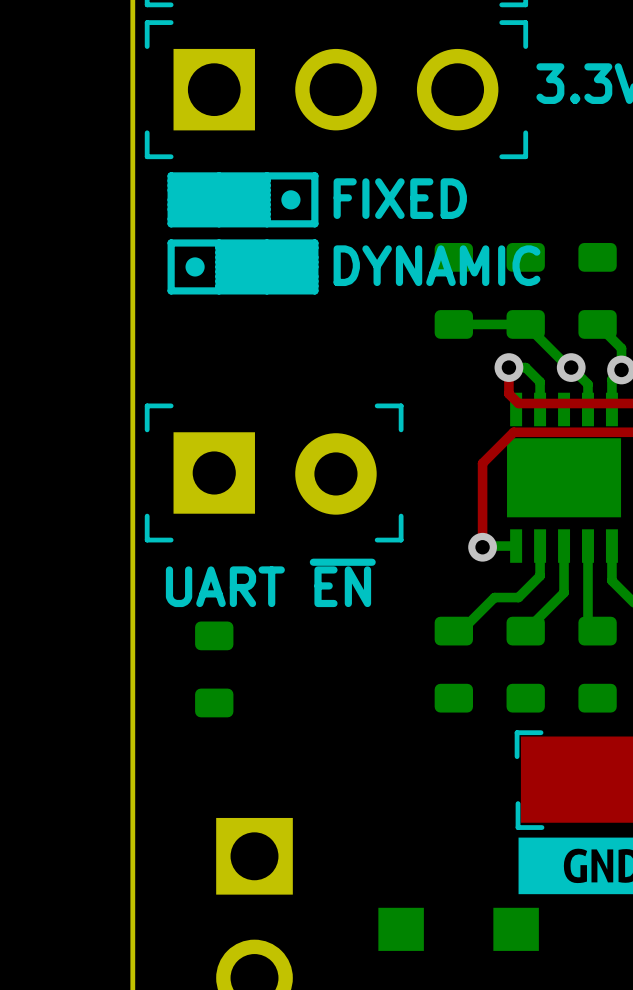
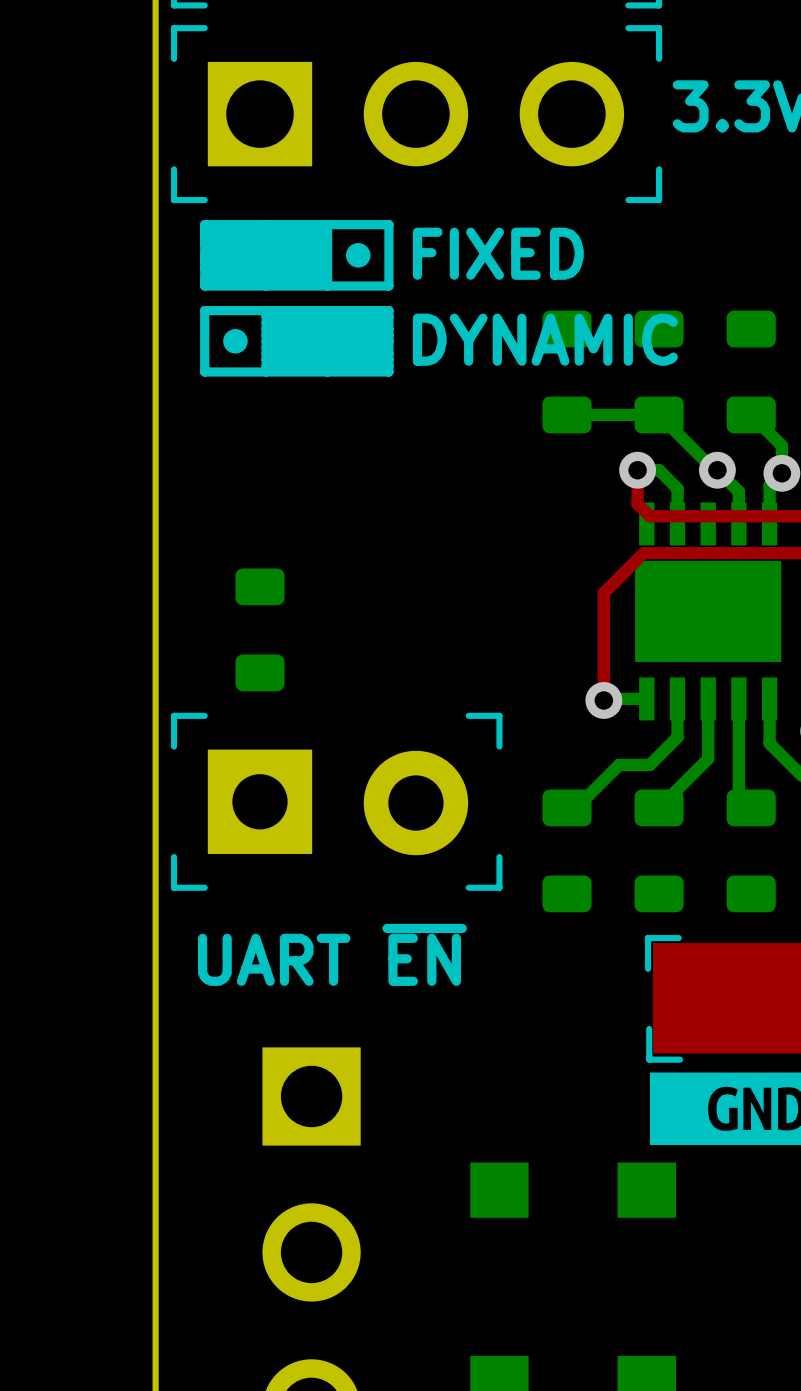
part position: (274, 472) -> (336, 801)
text position: UART ~{EN} (270, 582) -> UART ~{EN} (332, 954)
part position: (214, 669) -> (259, 629)

